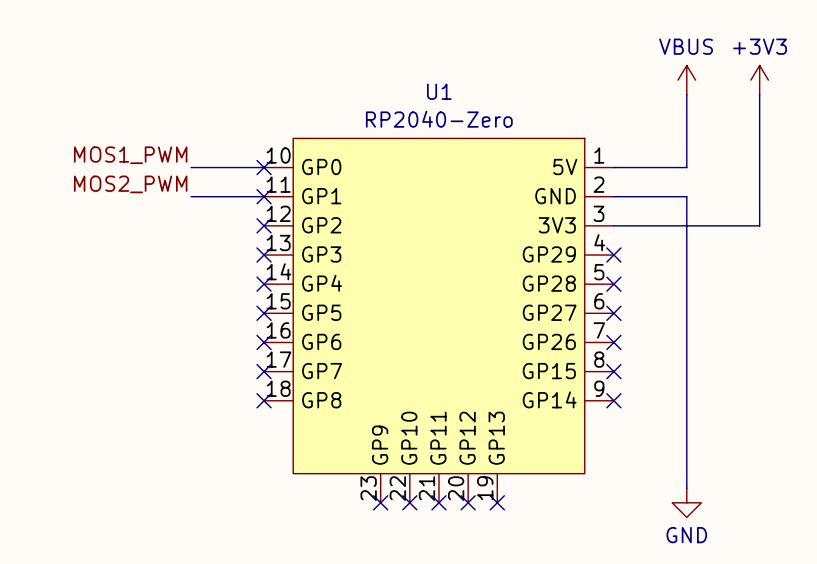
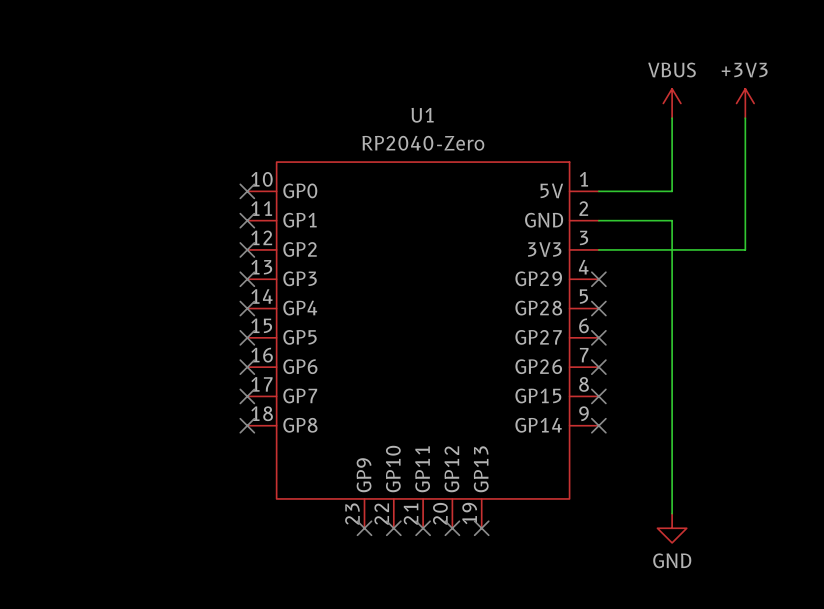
label: MOS1_PWM (130, 155) -> none
wire: (191, 167) (264, 167) -> none
label: MOS2_PWM (130, 184) -> none
wire: (191, 196) (264, 196) -> none

